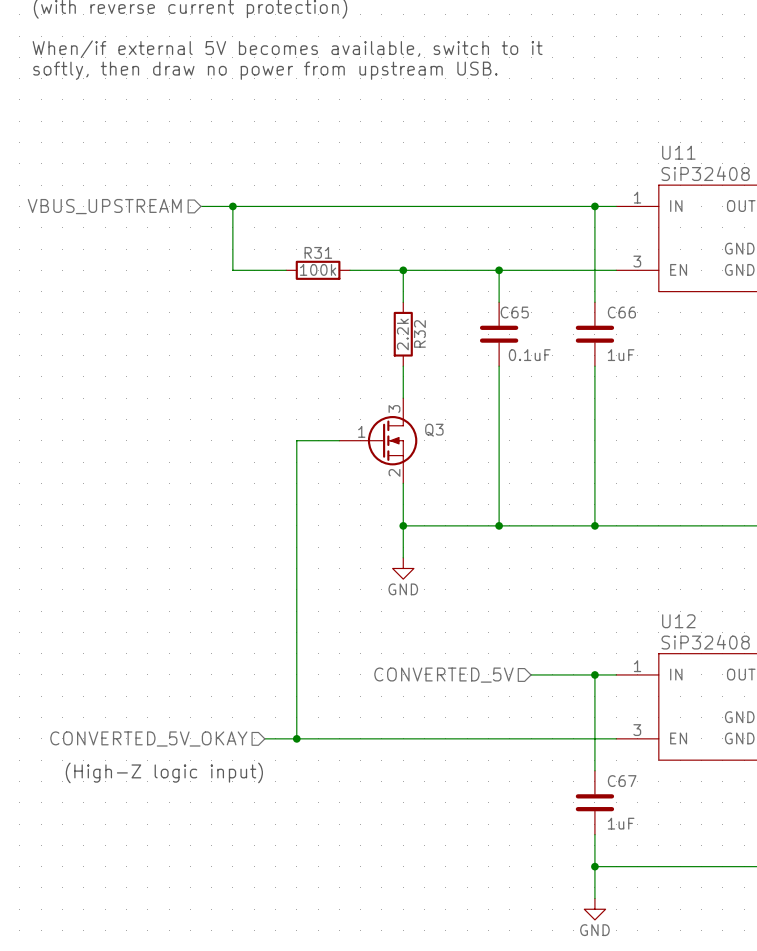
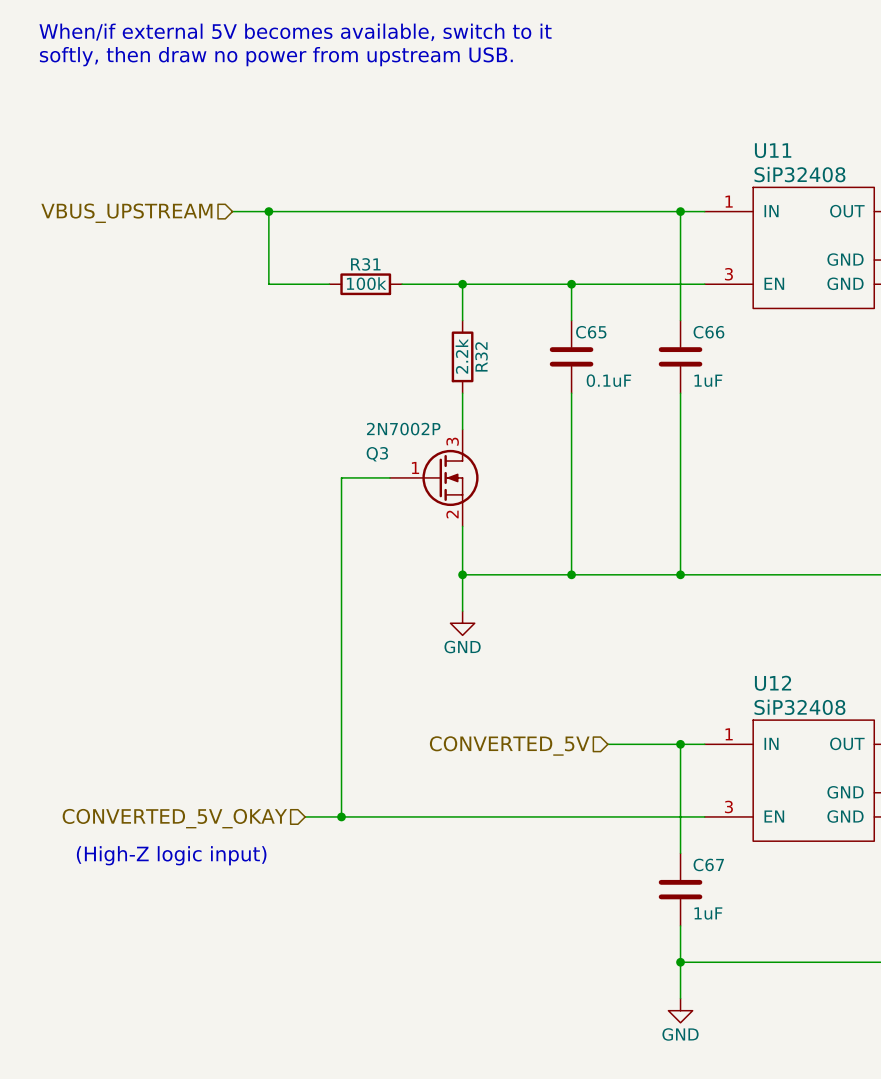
Q3 value: none -> 2N7002P (403, 429)
Q3 name position: Q3 (434, 430) -> Q3 (377, 454)

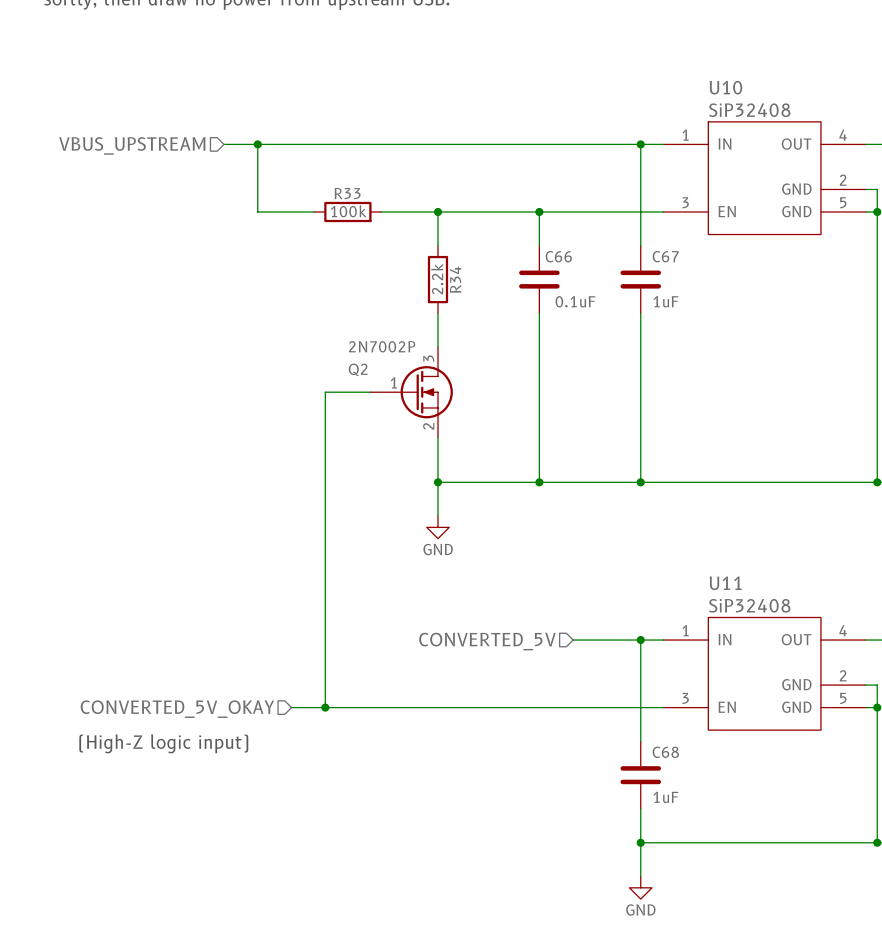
U11 name: U11 (773, 150) -> U10 (725, 87)
R31 name: R31 (365, 264) -> R33 (347, 193)
C65 name: C65 (591, 332) -> C66 (558, 256)
C66 name: C66 (708, 332) -> C67 (665, 256)
R32 name: R32 (481, 356) -> R34 (455, 279)
Q3 name: Q3 (377, 454) -> Q2 (358, 369)
U12 name: U12 (773, 683) -> U11 (725, 583)
C67 name: C67 (708, 864) -> C68 (665, 752)

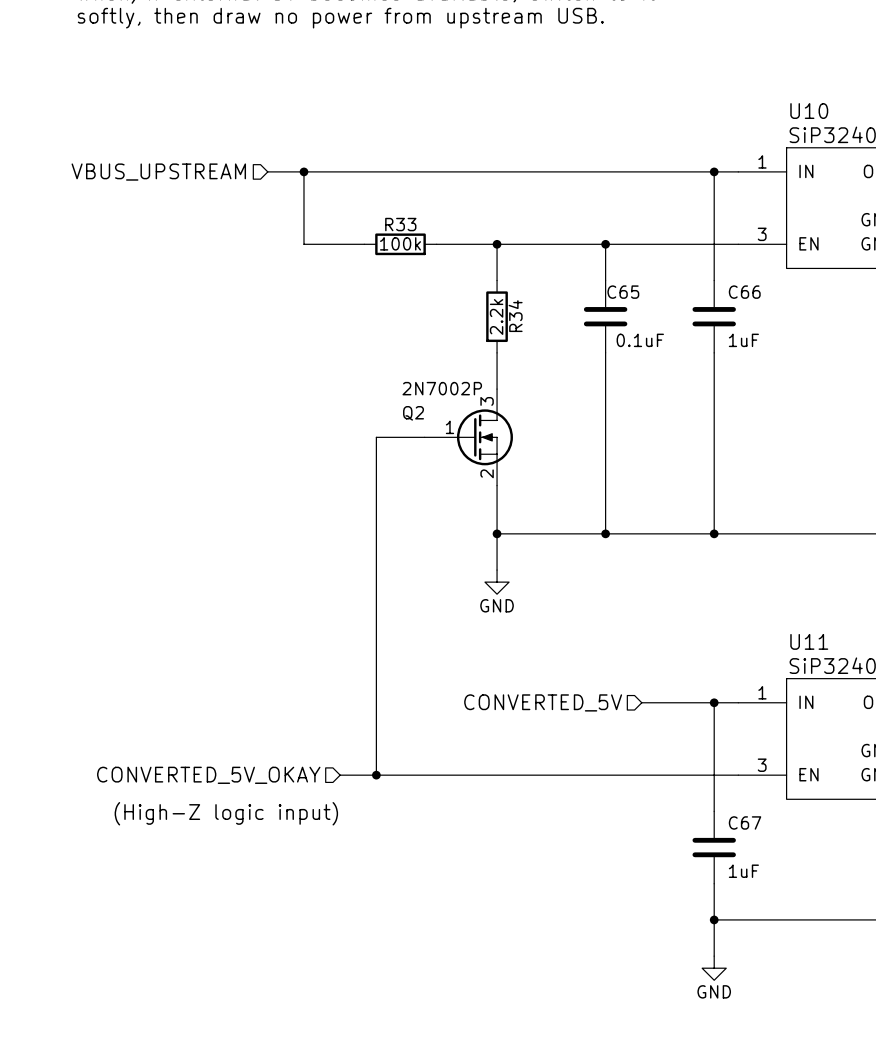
C66 name: C66 (558, 256) -> C65 (623, 292)
C67 name: C67 (665, 256) -> C66 (744, 292)
C68 name: C68 (665, 752) -> C67 (745, 822)

